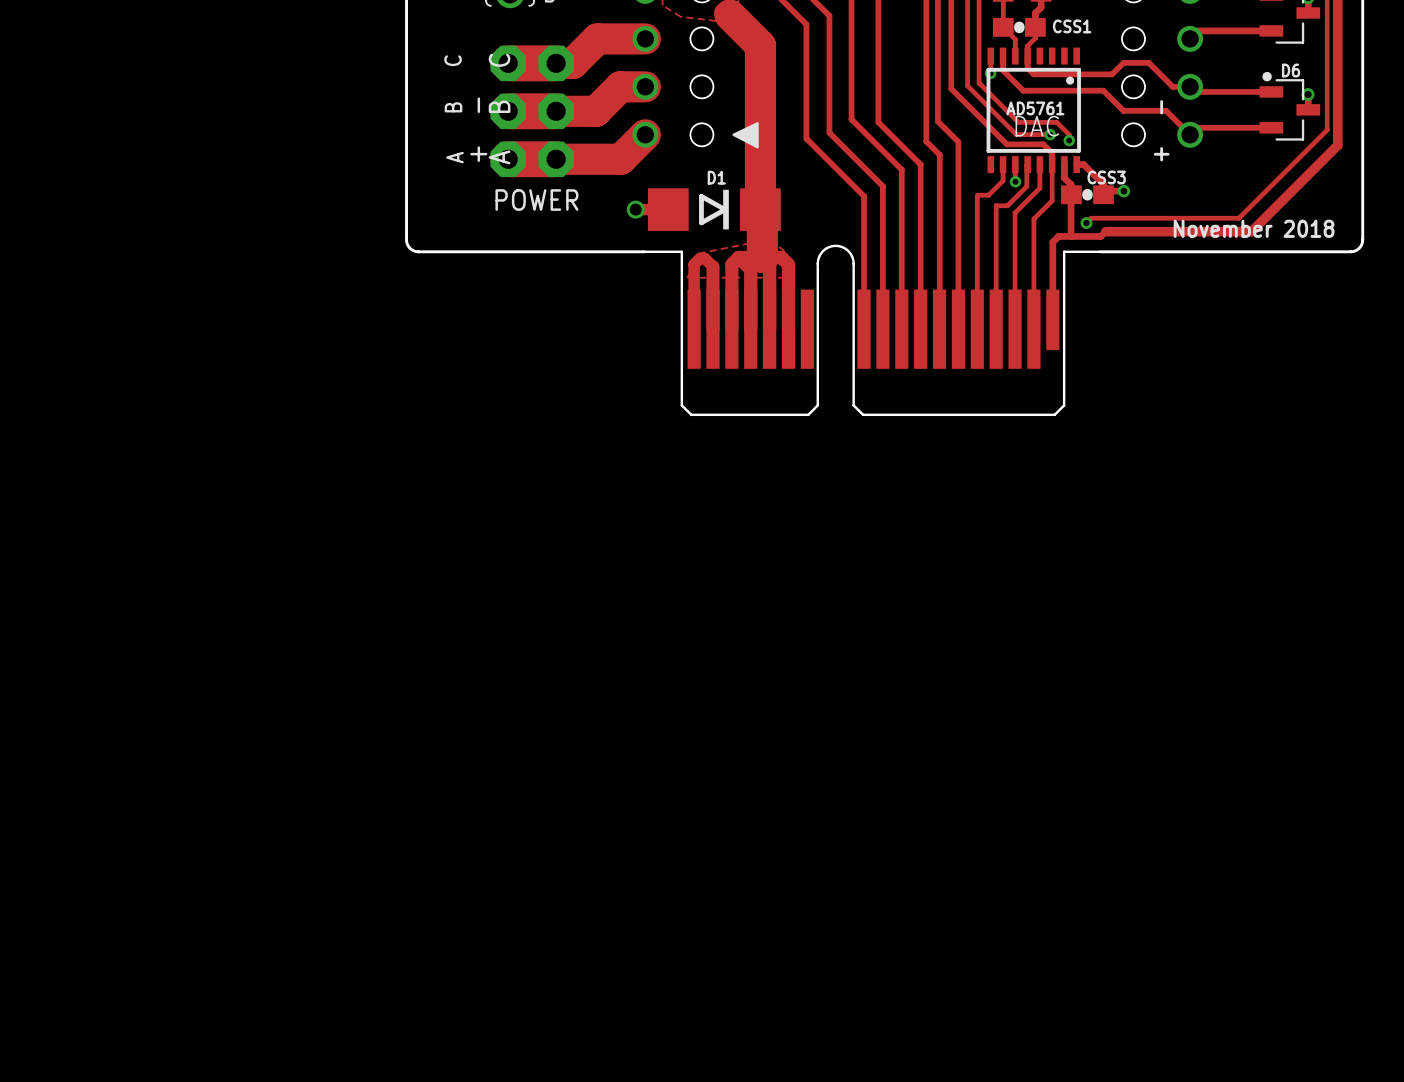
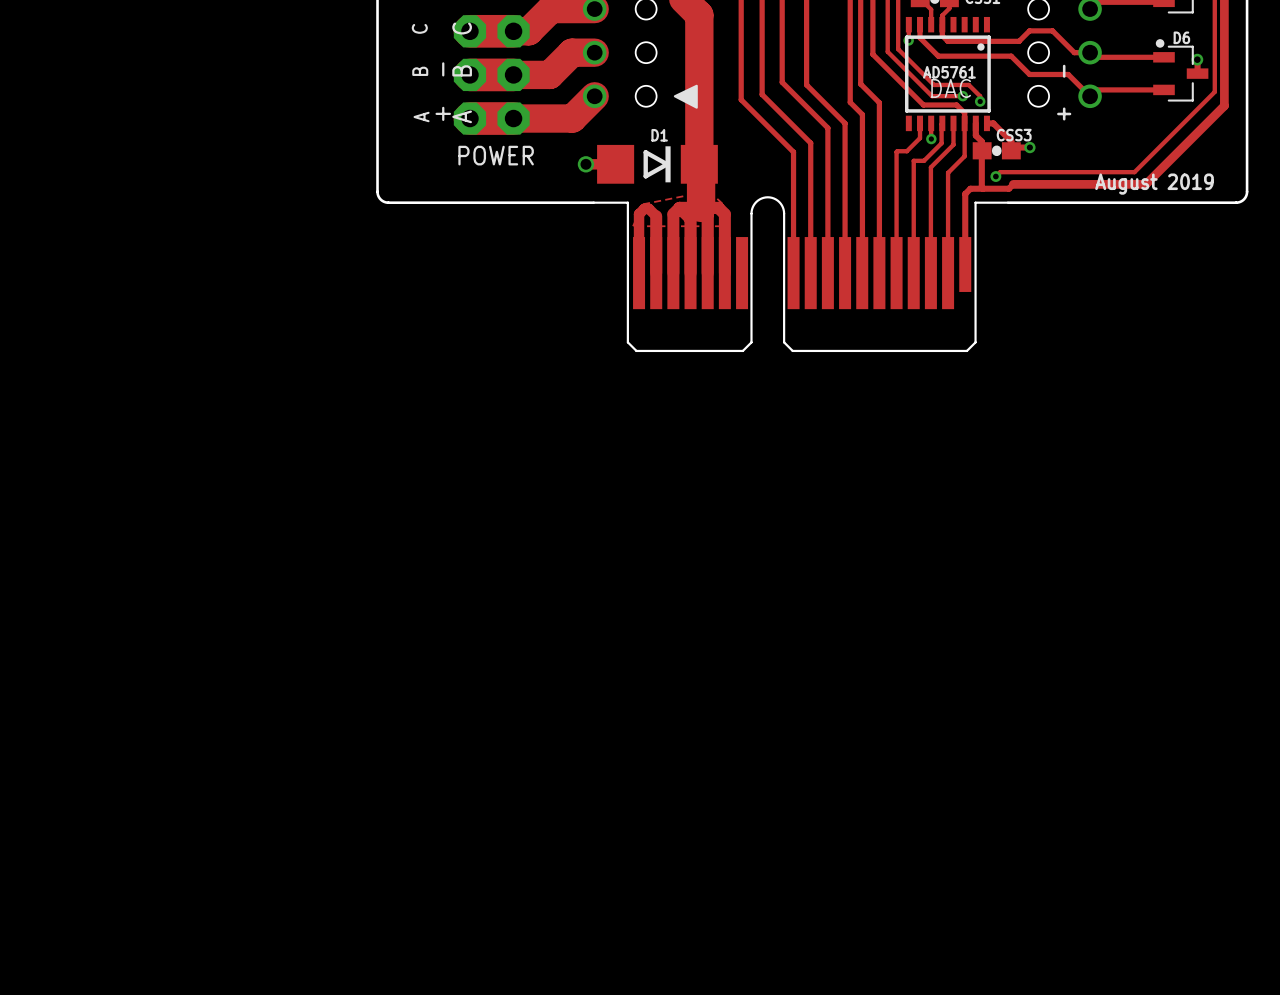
text: November 2018 (1254, 228) -> none
text: none -> August 2019 (1154, 184)

